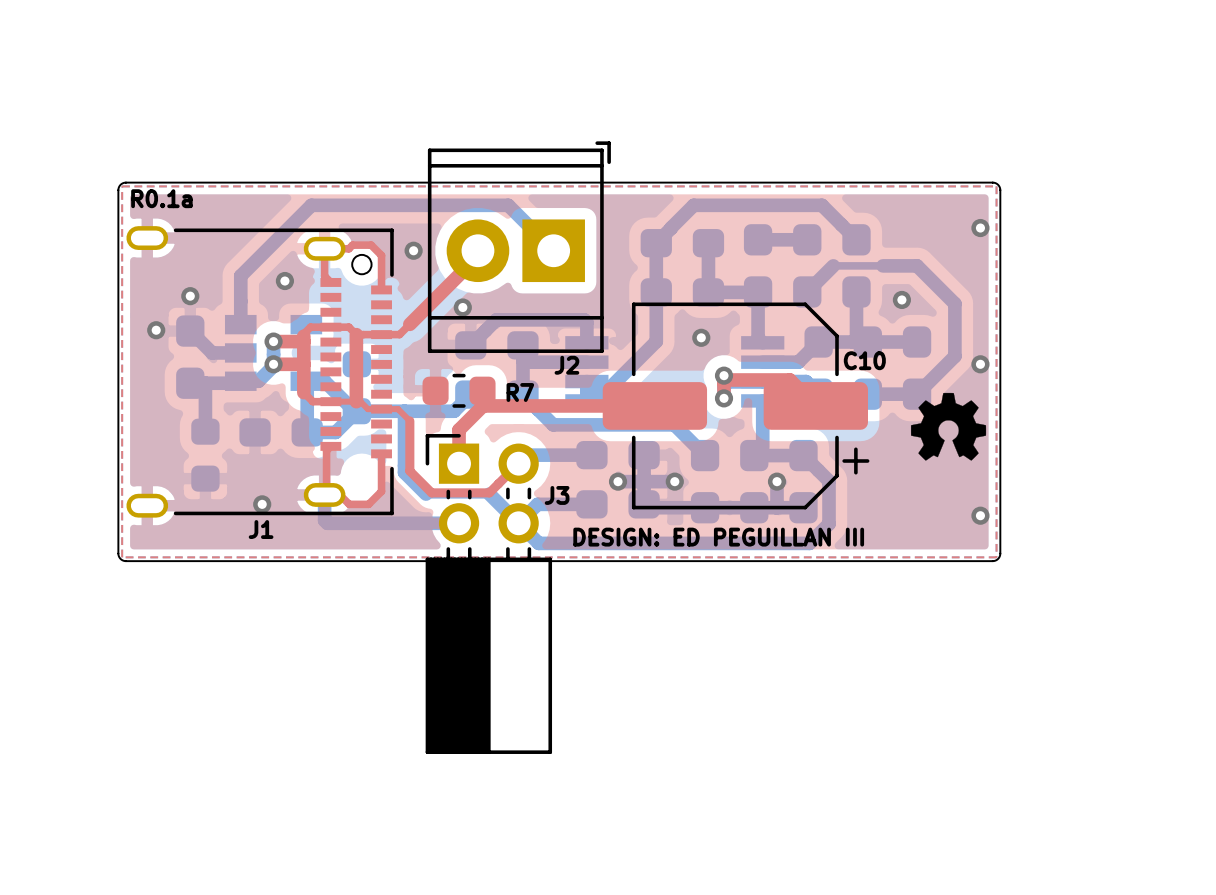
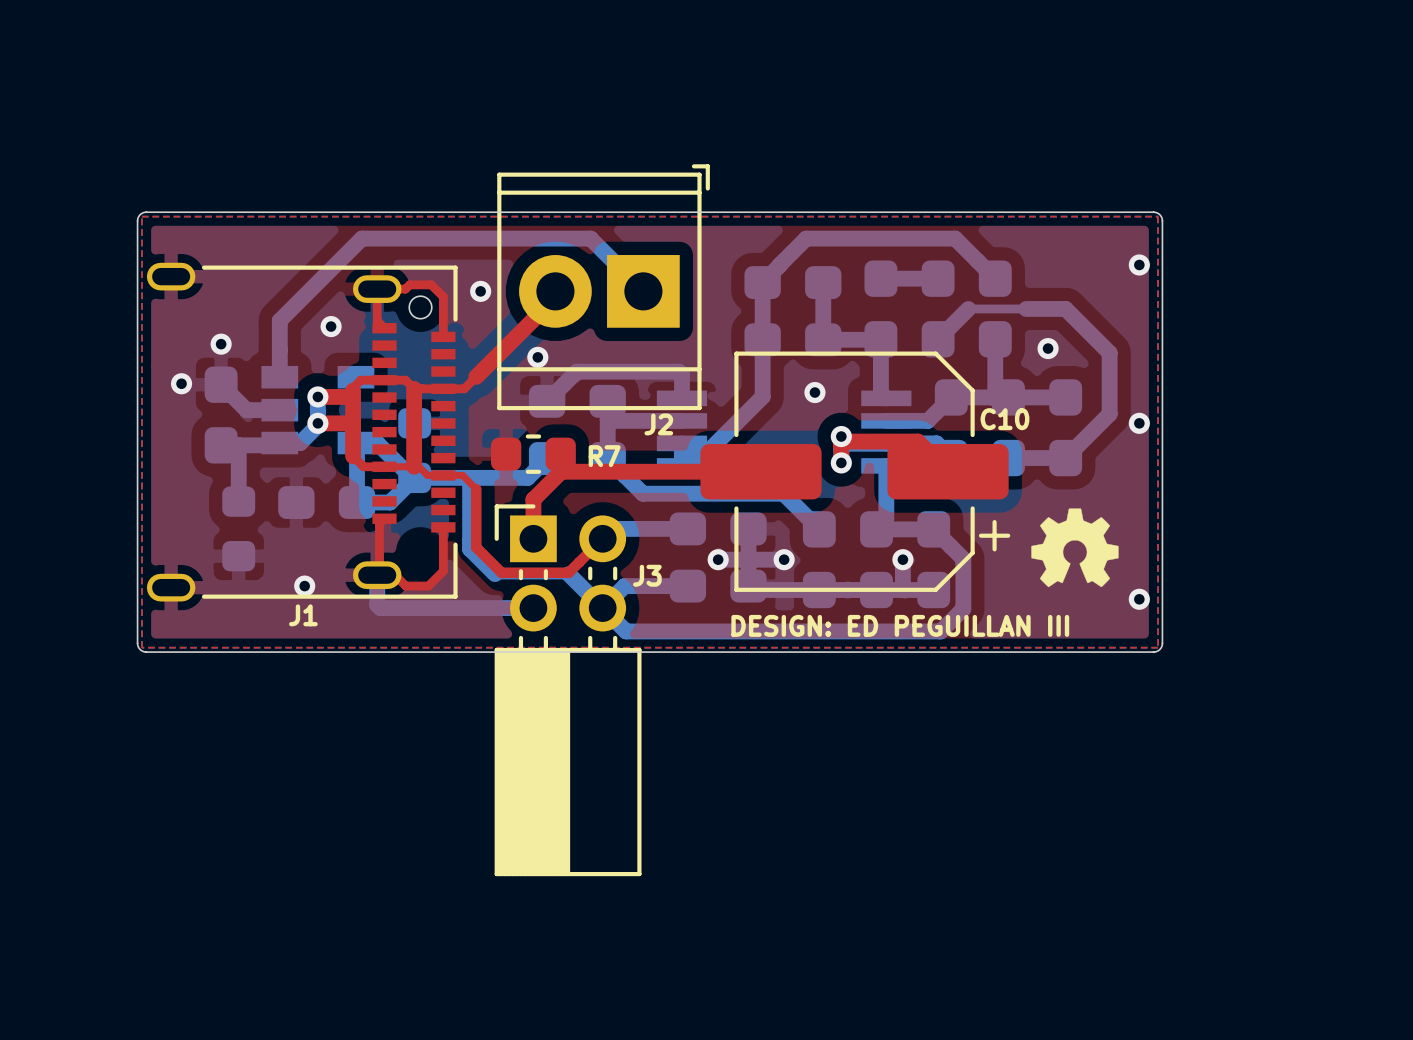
text: R0.1a (161, 198) -> none
drawing position: (948, 426) -> (1074, 547)
text position: DESIGN: ED PEGUILLAN III (718, 537) -> DESIGN: ED PEGUILLAN III (900, 625)

